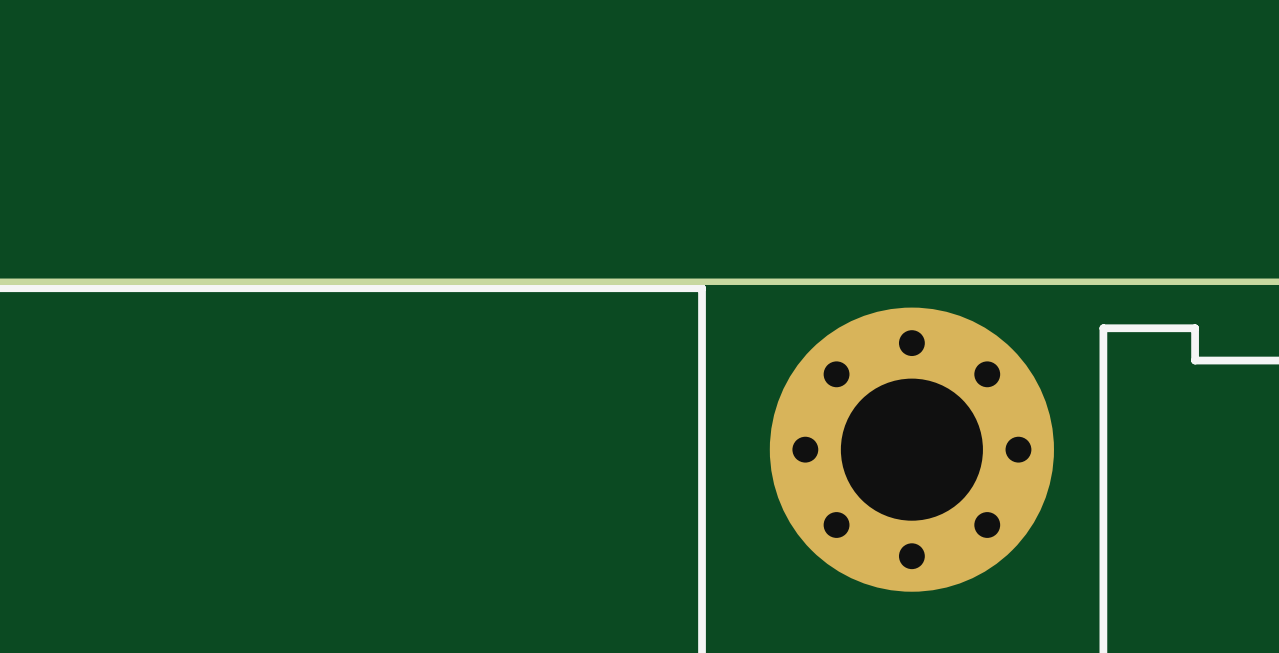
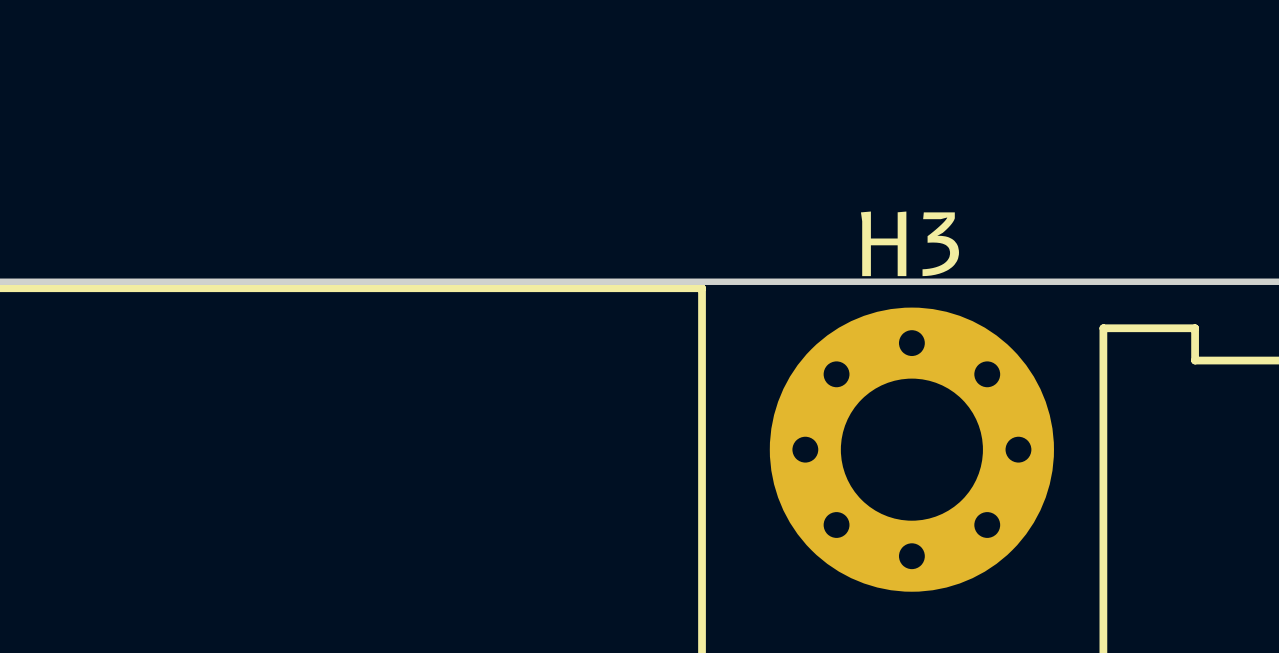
H3 name: none -> H3 (909, 243)

